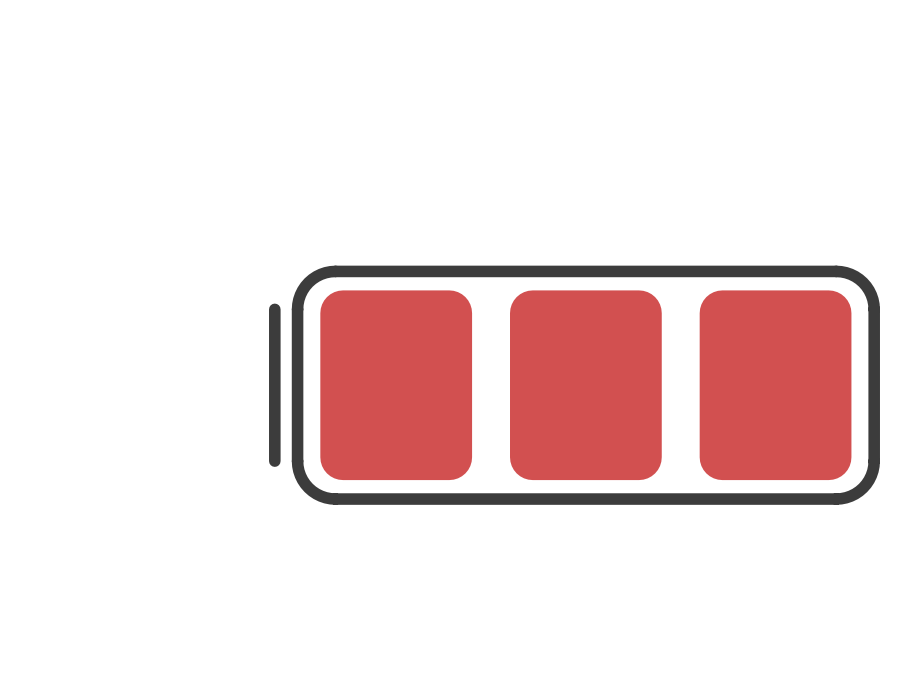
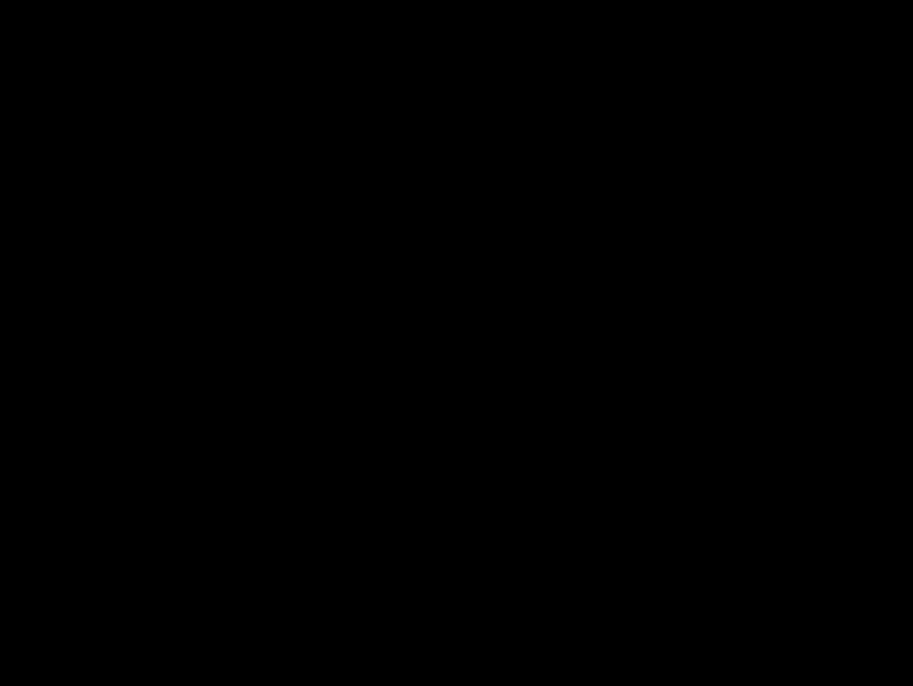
part: (574, 385) -> none

